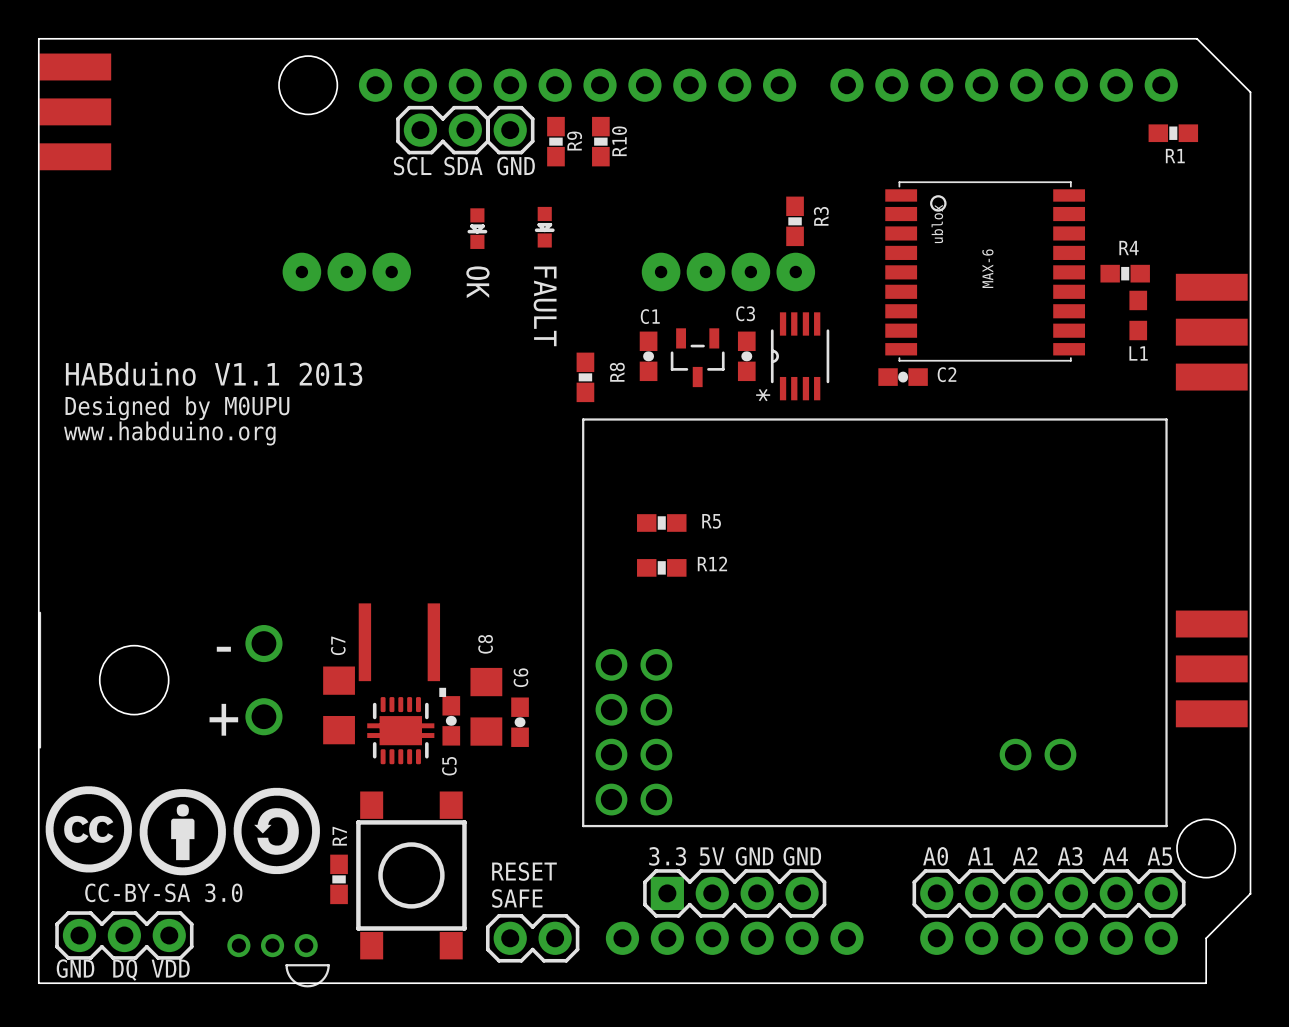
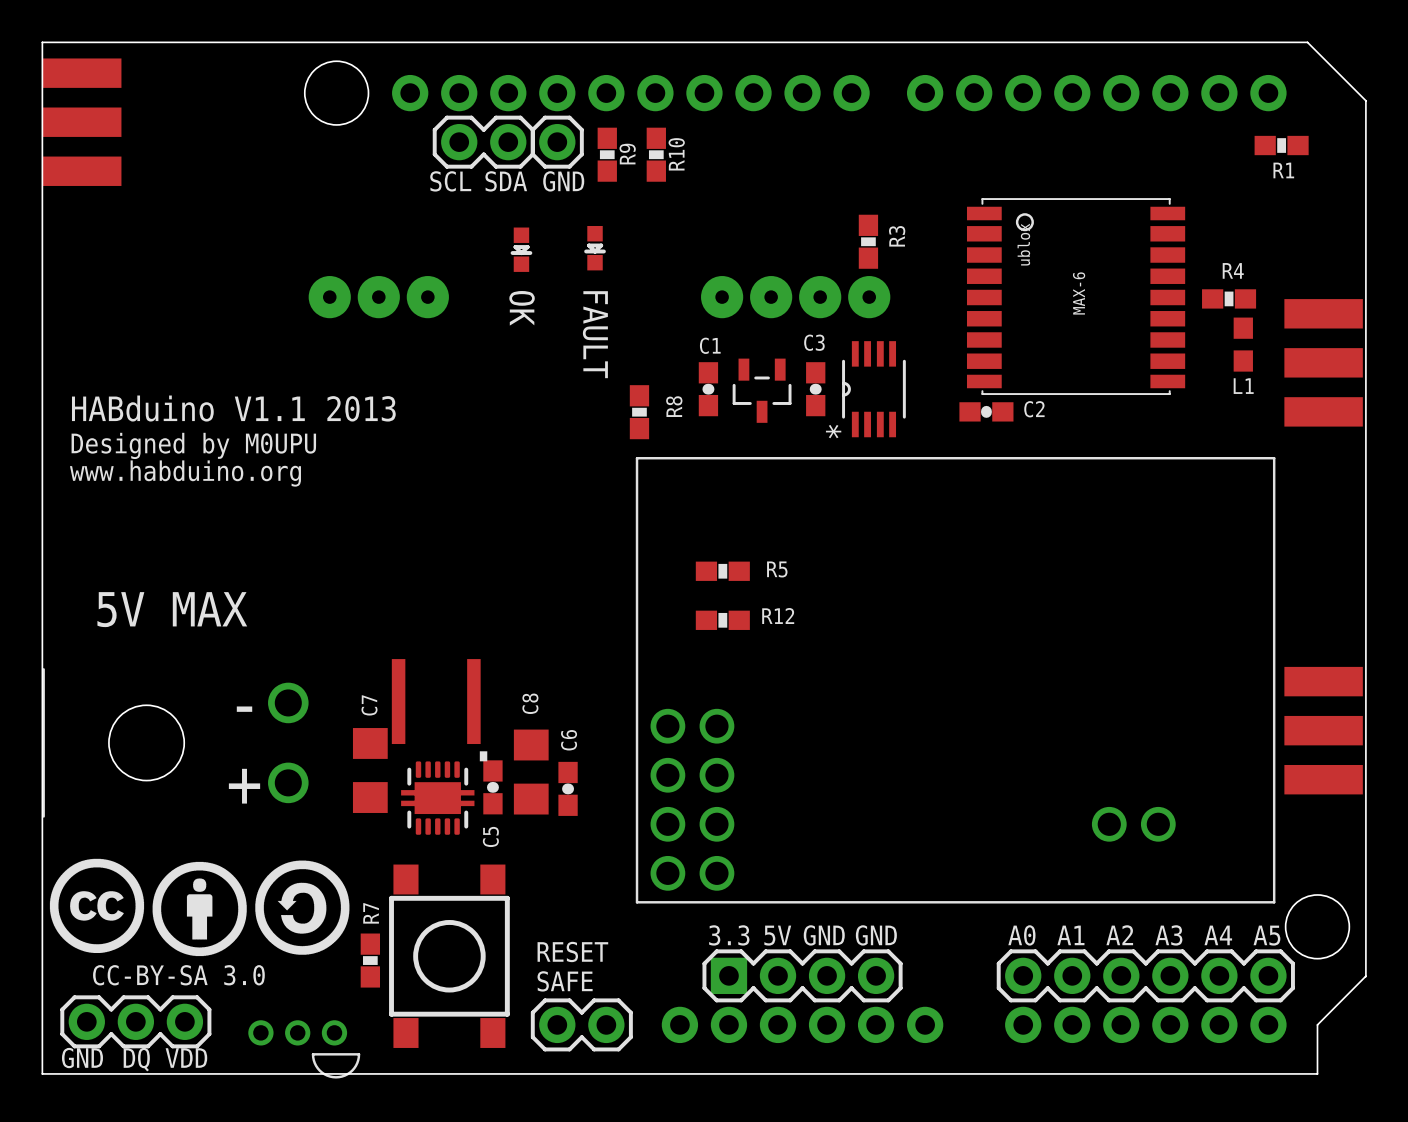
text: none -> 5V MAX (172, 609)

